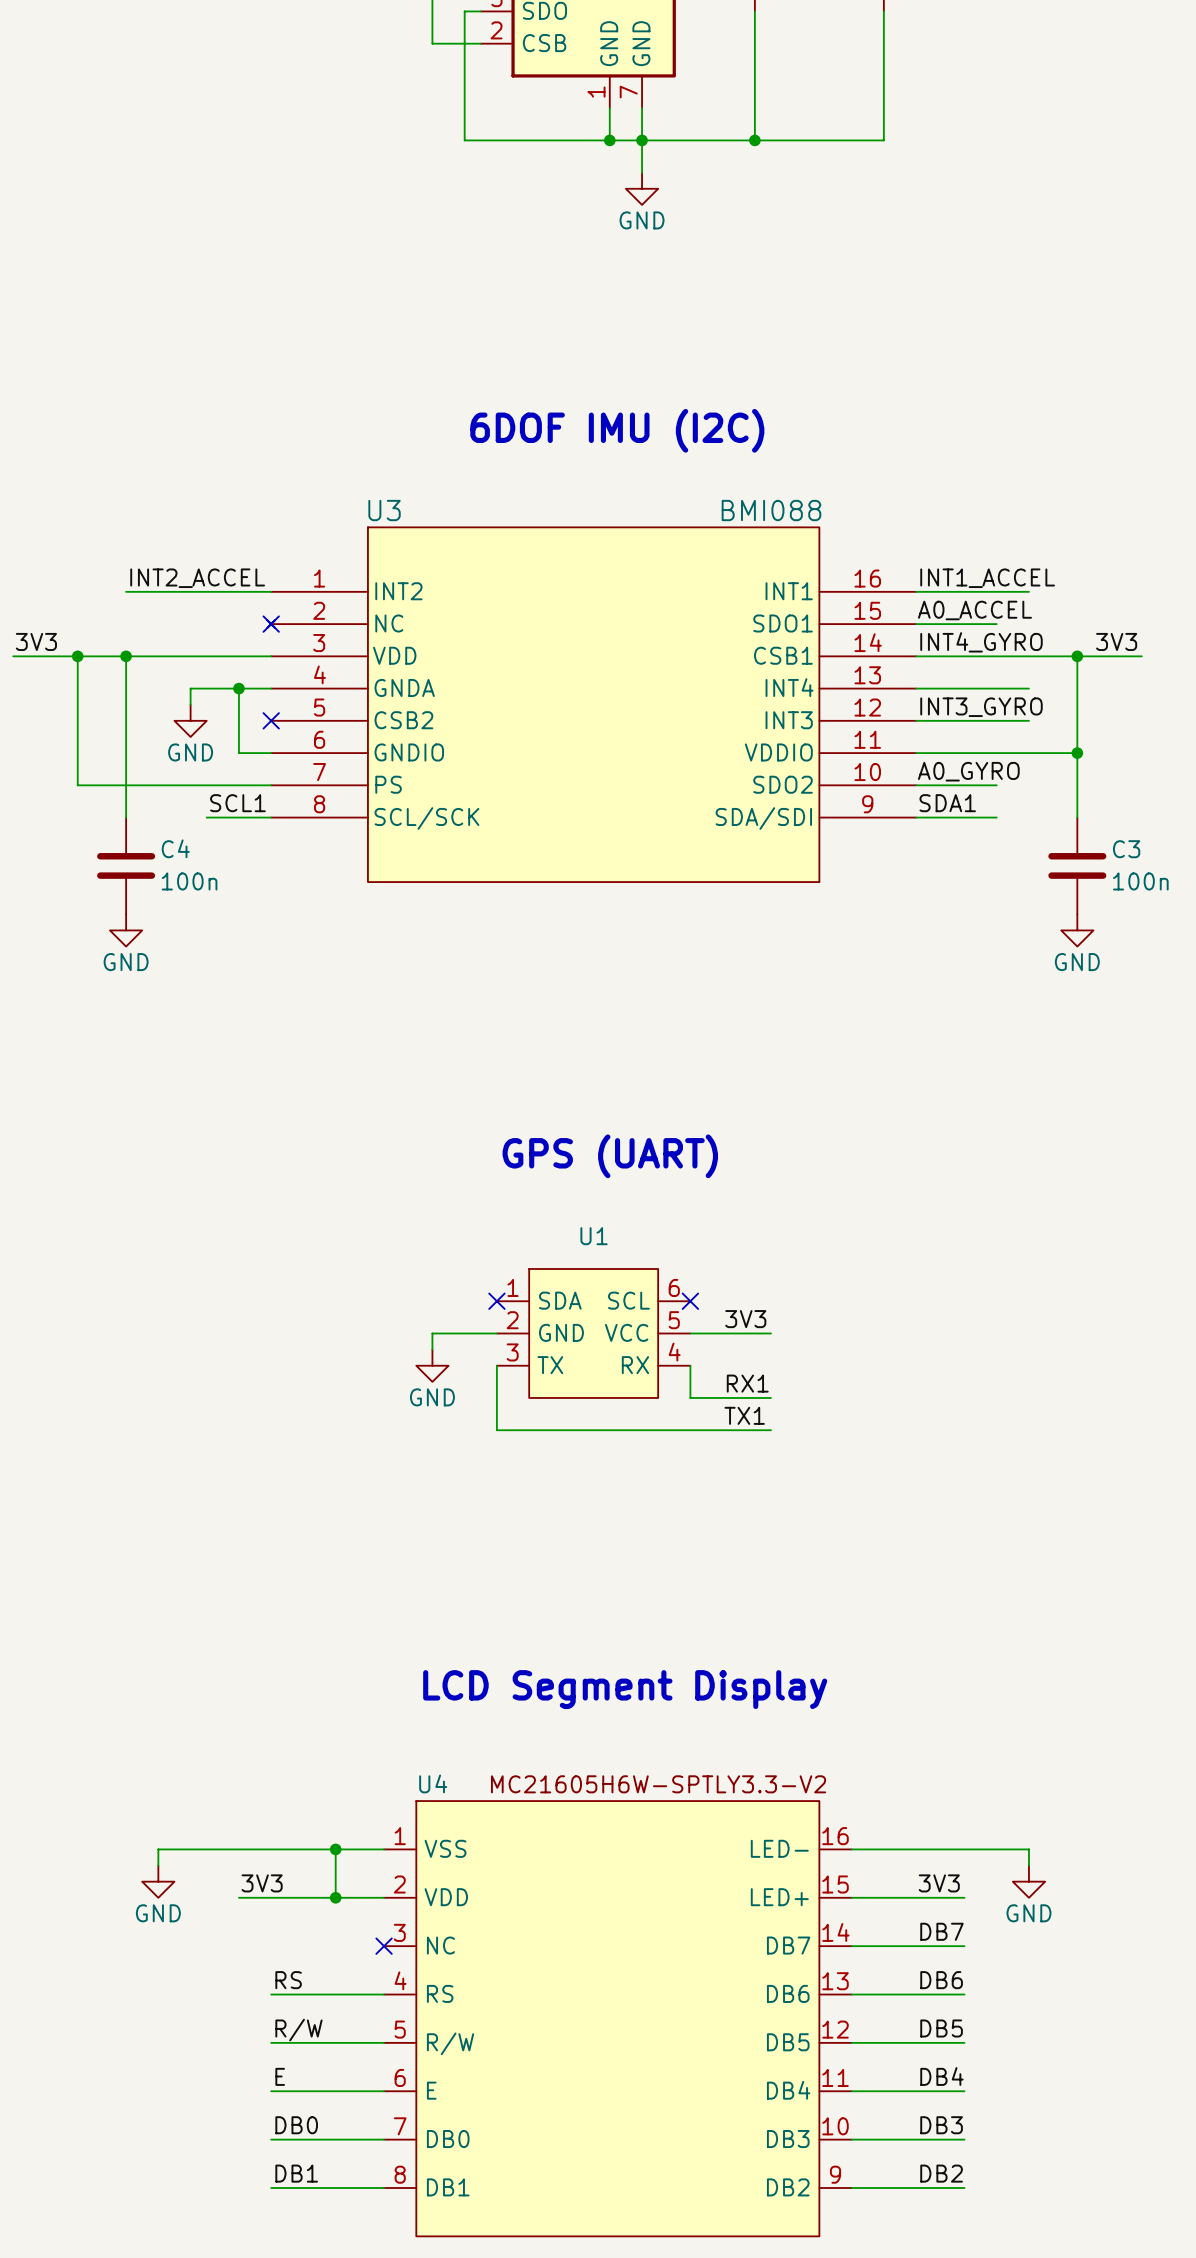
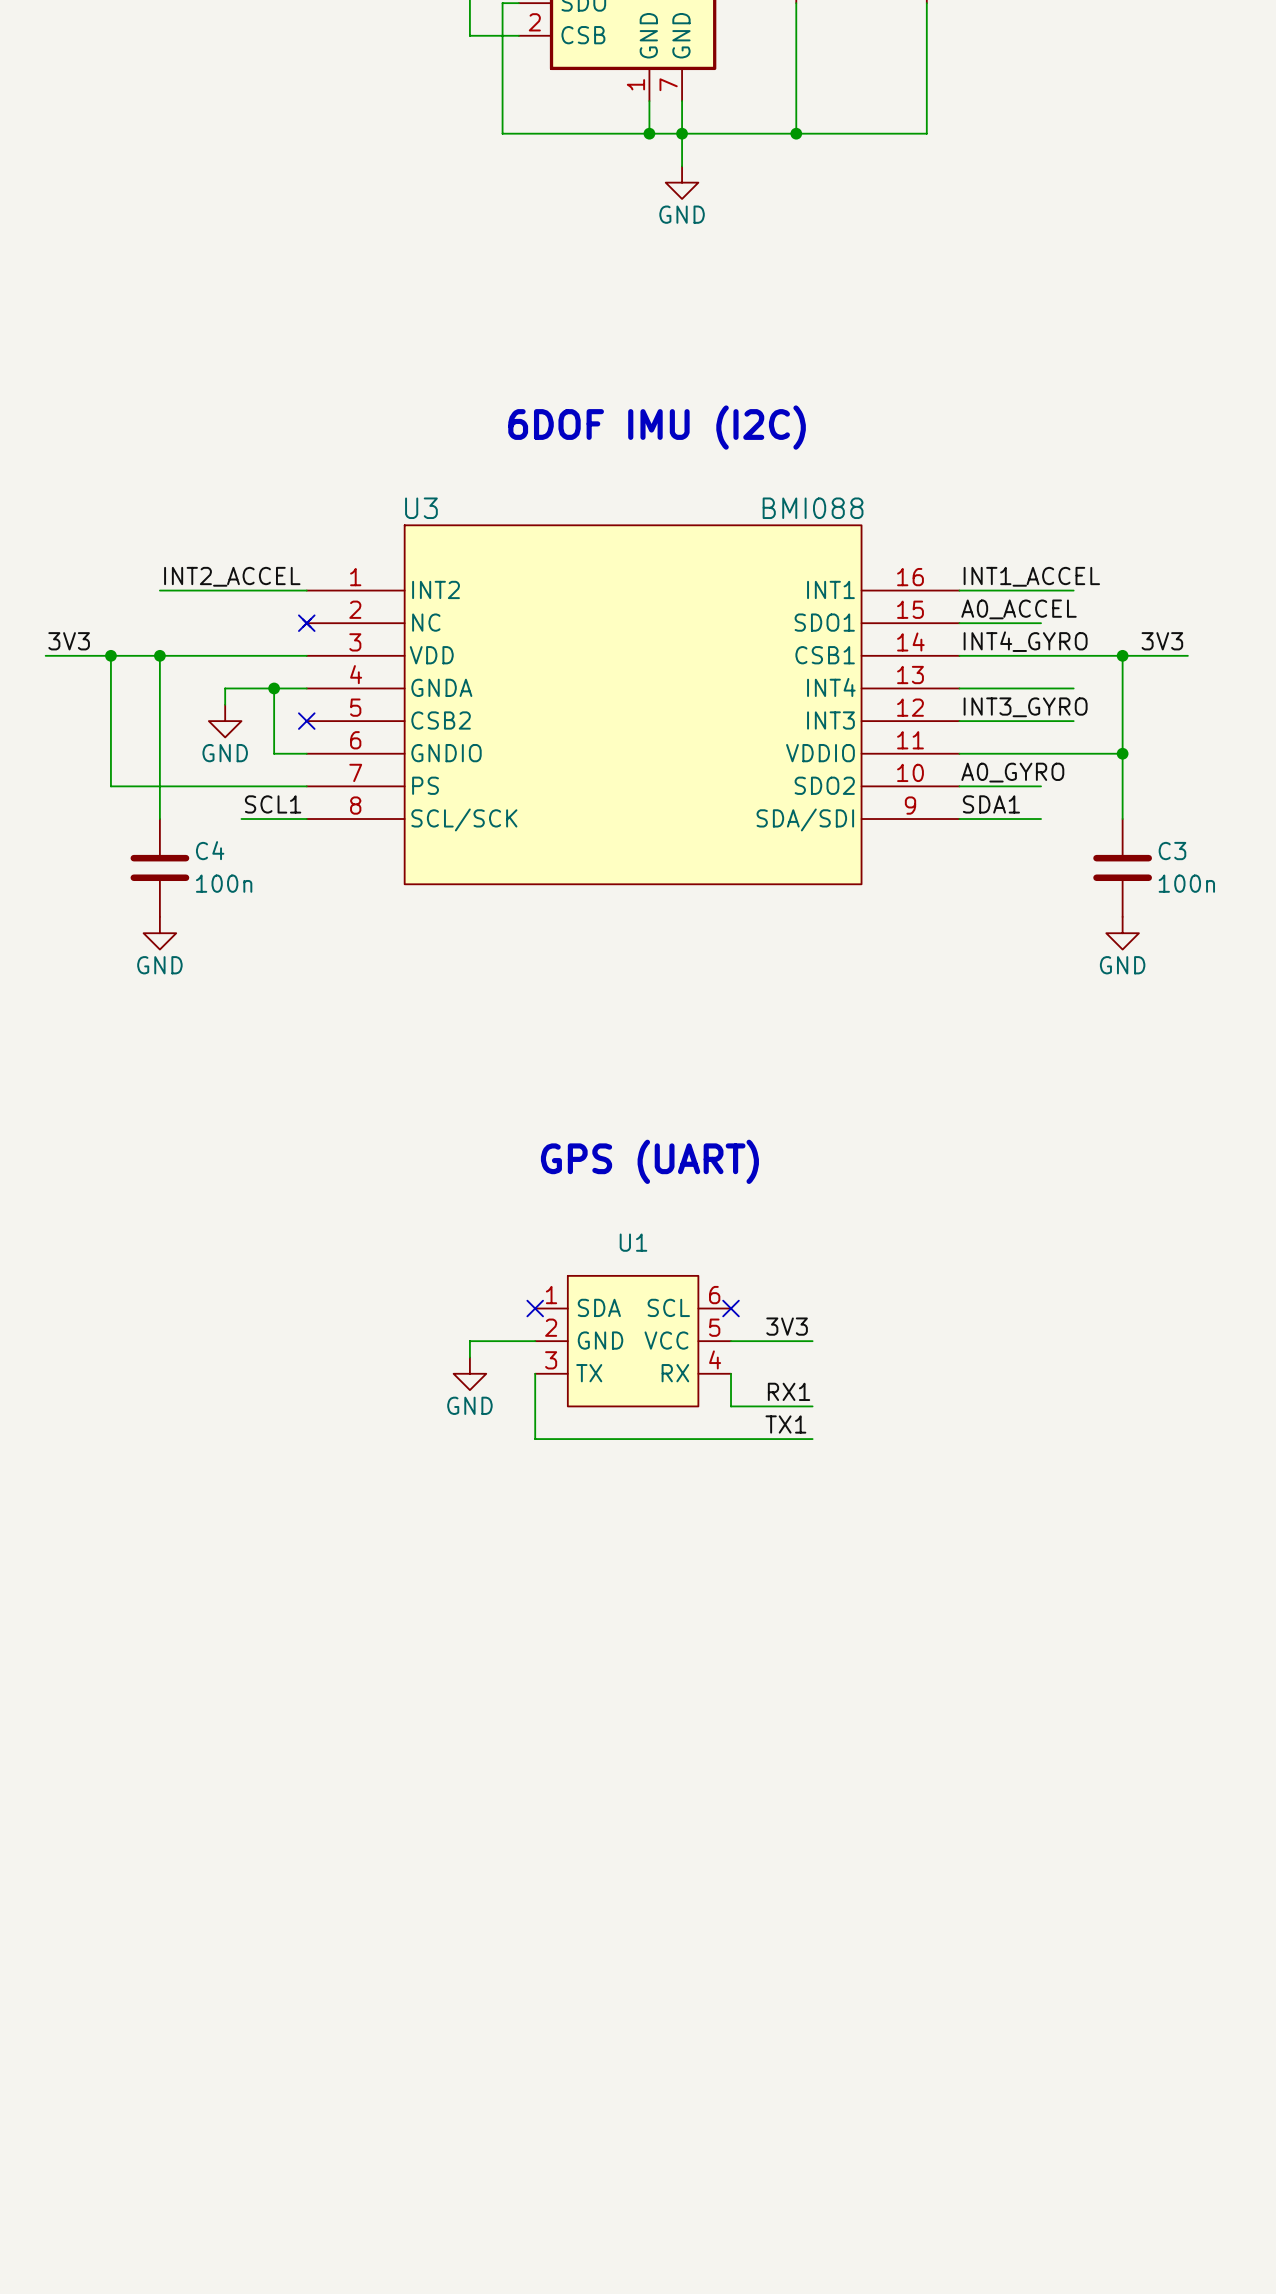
text: LCD Segment Display (625, 1689) -> none
wire: (335, 1849) (335, 1897) -> none
junction: (335, 1849) -> none
wire: (384, 1849) (158, 1849) (158, 1865) -> none
wire: (851, 1849) (1028, 1849) (1028, 1865) -> none
power symbol: GND (158, 1881) -> none
power symbol: GND (1028, 1881) -> none
label: 3V3 (262, 1883) -> none
label: 3V3 (939, 1883) -> none
wire: (238, 1897) (384, 1897) -> none
junction: (335, 1897) -> none
wire: (851, 1897) (964, 1897) -> none
label: DB7 (941, 1931) -> none
no-connect mark: (384, 1946) -> none
wire: (851, 1946) (964, 1946) -> none
label: RS (288, 1980) -> none
label: DB6 (941, 1980) -> none
wire: (271, 1994) (384, 1994) -> none
wire: (851, 1994) (964, 1994) -> none
U4: (617, 2018) -> none
label: DB5 (941, 2028) -> none
label: R/W (298, 2030) -> none
wire: (271, 2042) (384, 2042) -> none
wire: (851, 2042) (964, 2042) -> none
label: E (280, 2076) -> none
label: DB4 (941, 2076) -> none
wire: (271, 2091) (384, 2091) -> none
wire: (851, 2091) (964, 2091) -> none
label: DB0 (296, 2125) -> none
label: DB3 (941, 2125) -> none
wire: (271, 2139) (384, 2139) -> none
wire: (851, 2139) (964, 2139) -> none
label: DB1 (296, 2173) -> none
label: DB2 (941, 2173) -> none
wire: (271, 2187) (384, 2187) -> none
wire: (851, 2187) (964, 2187) -> none

